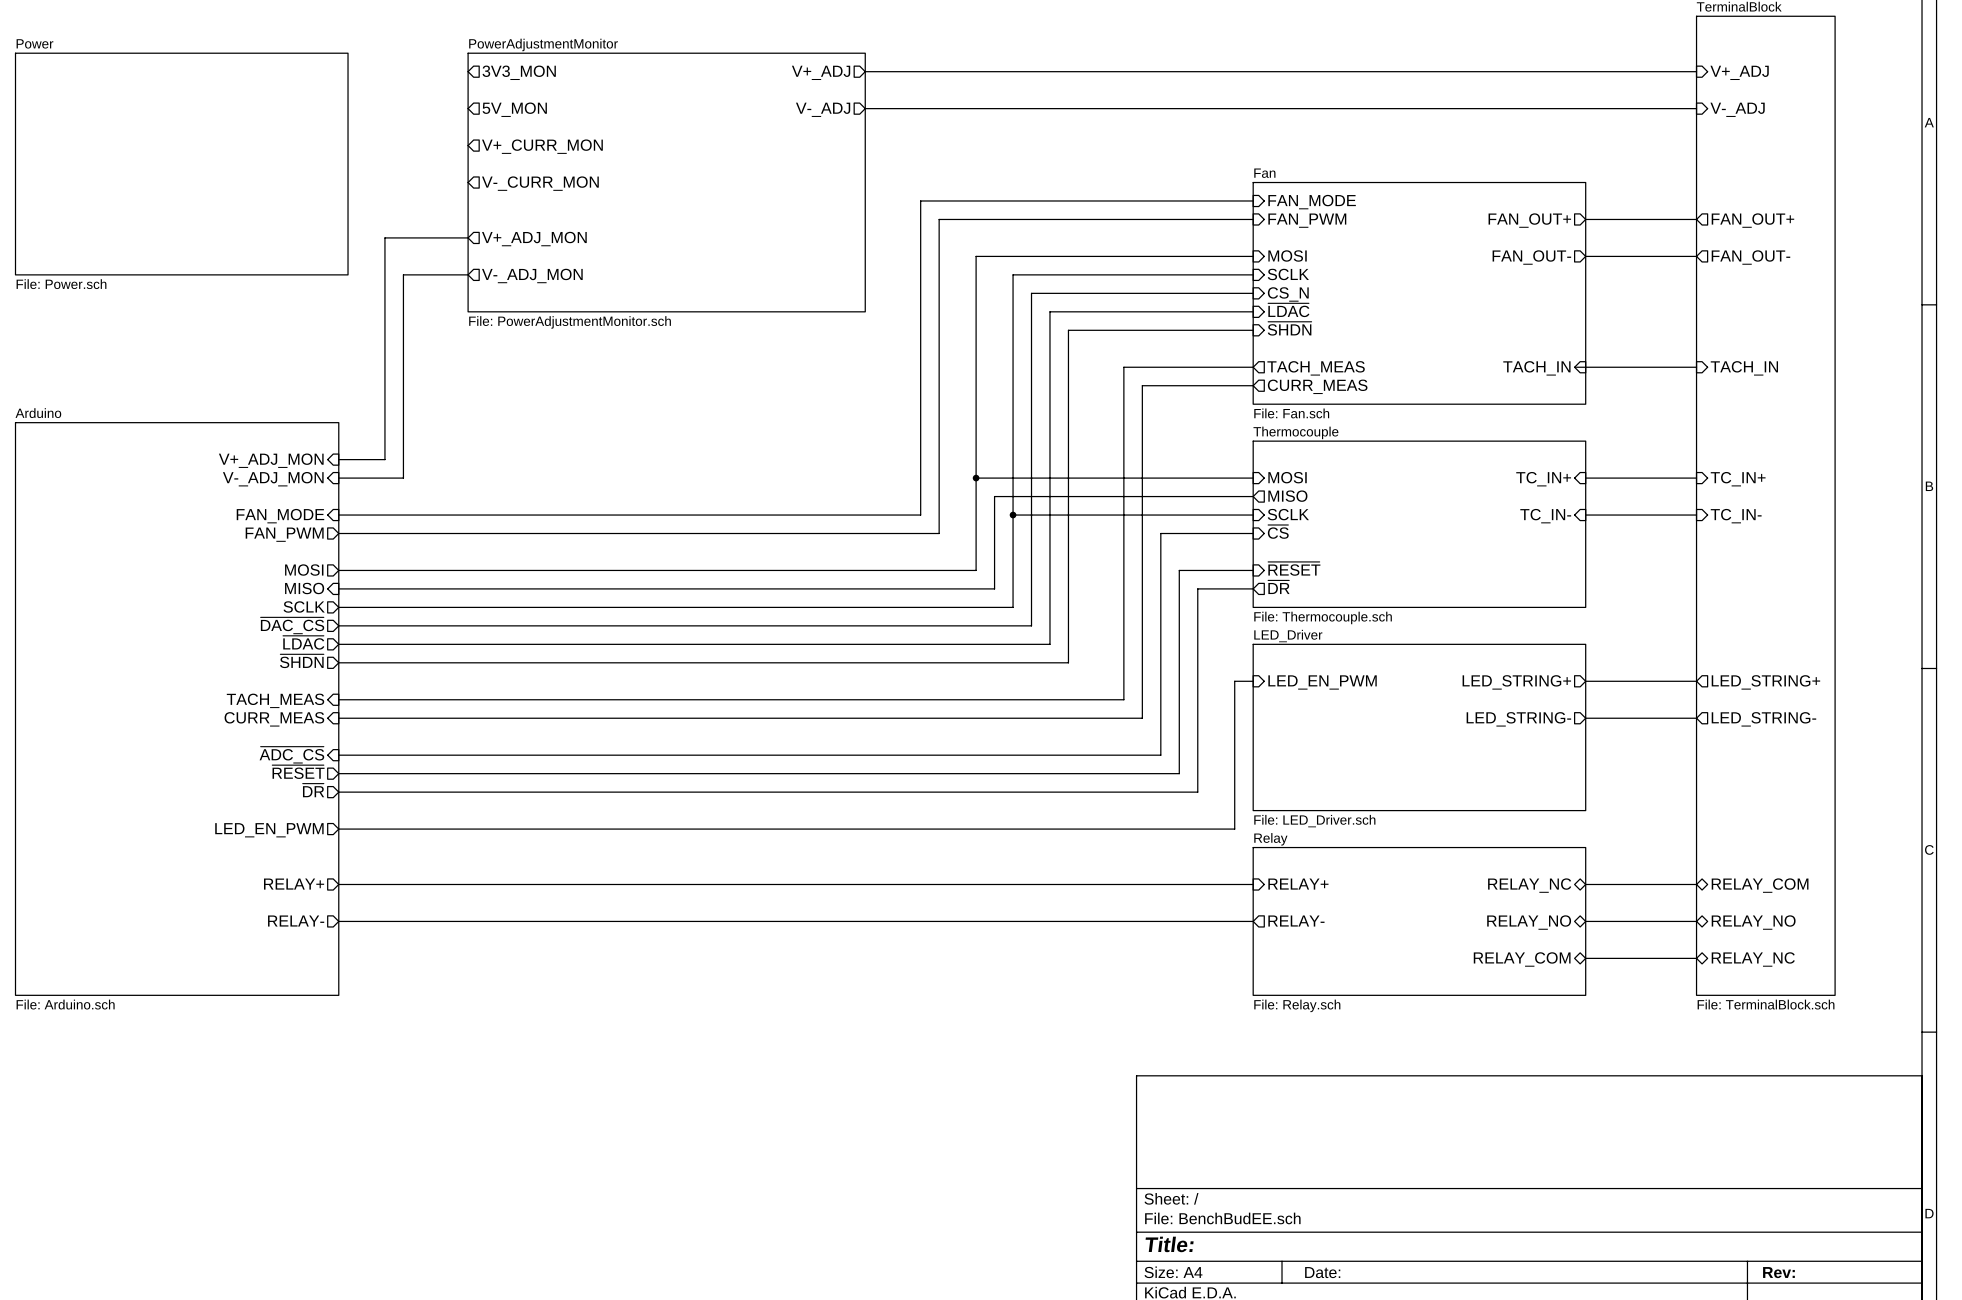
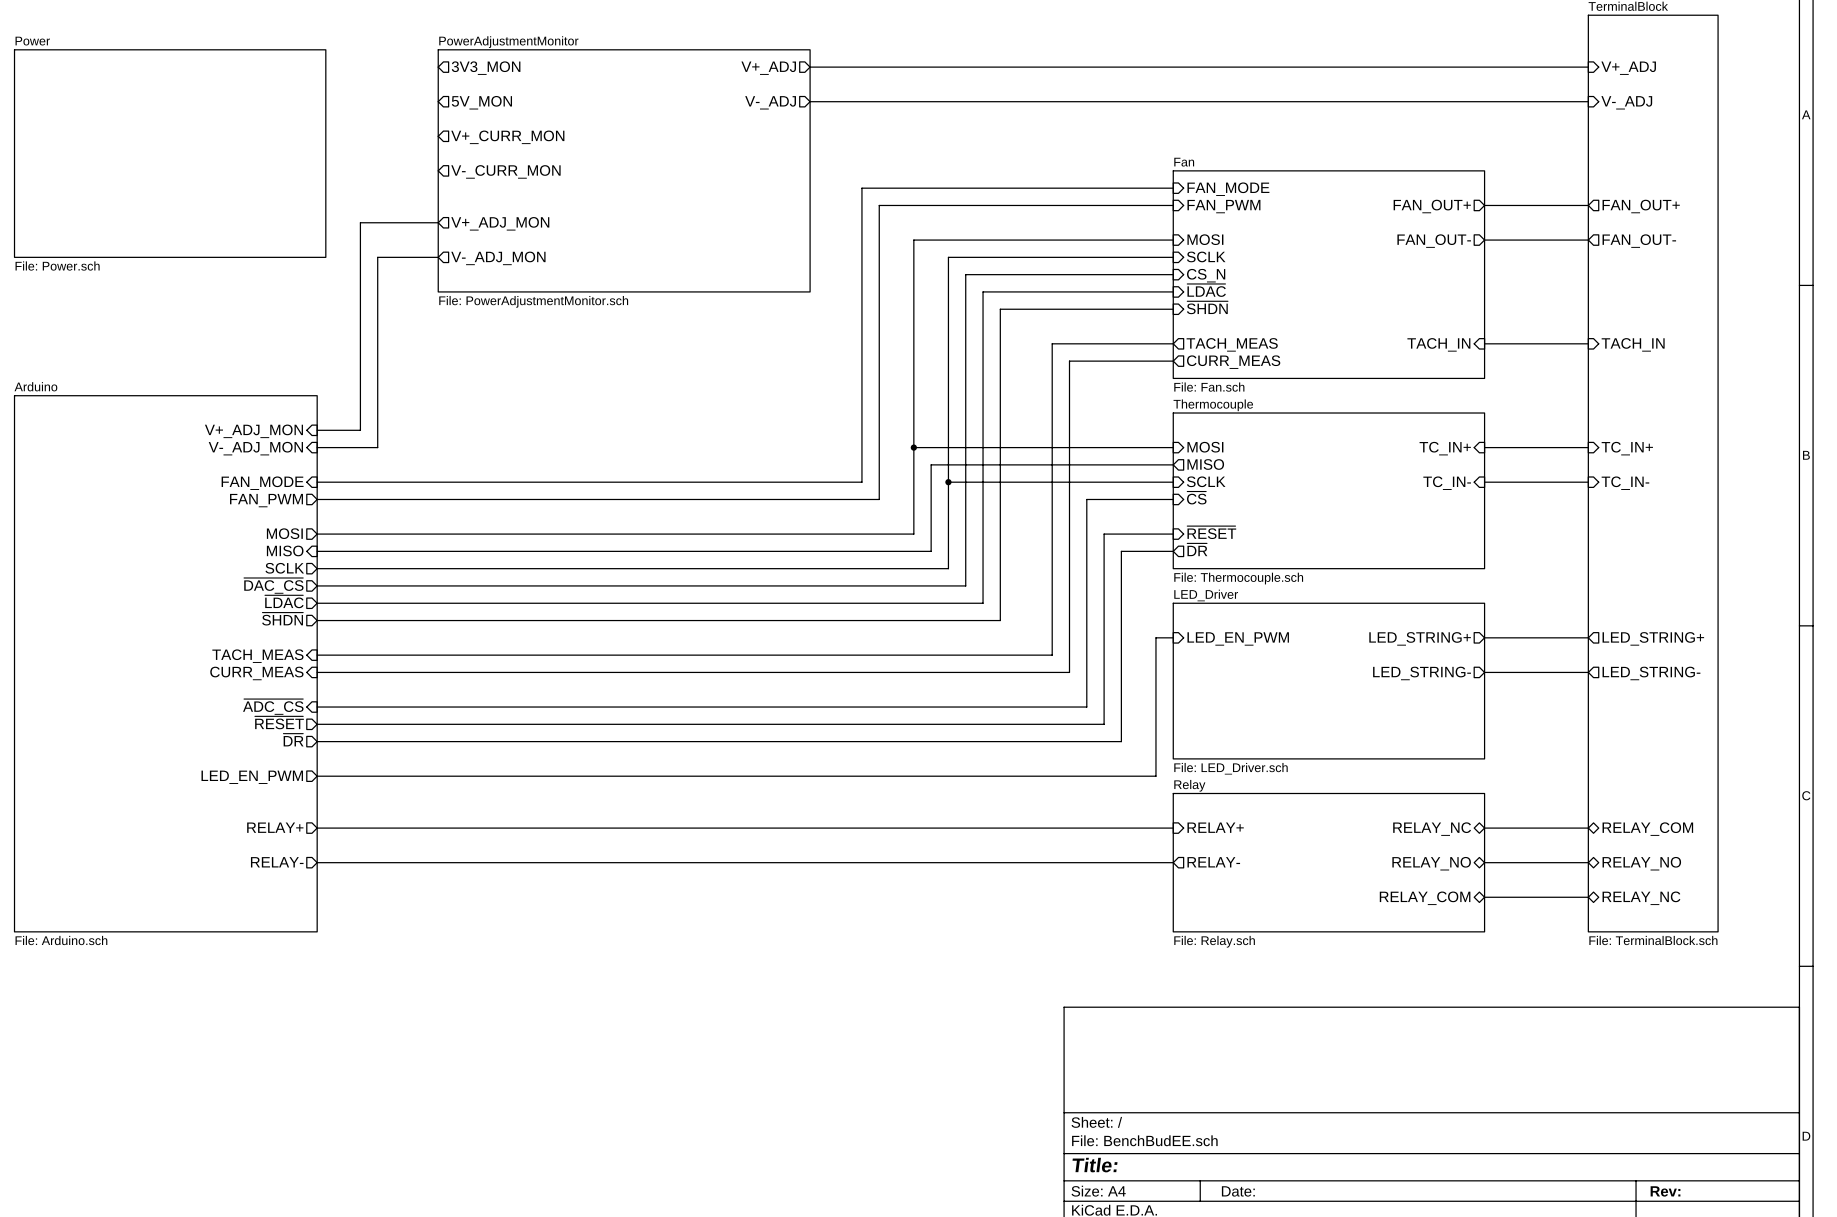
wire: (1576, 367) (1585, 367) -> none

